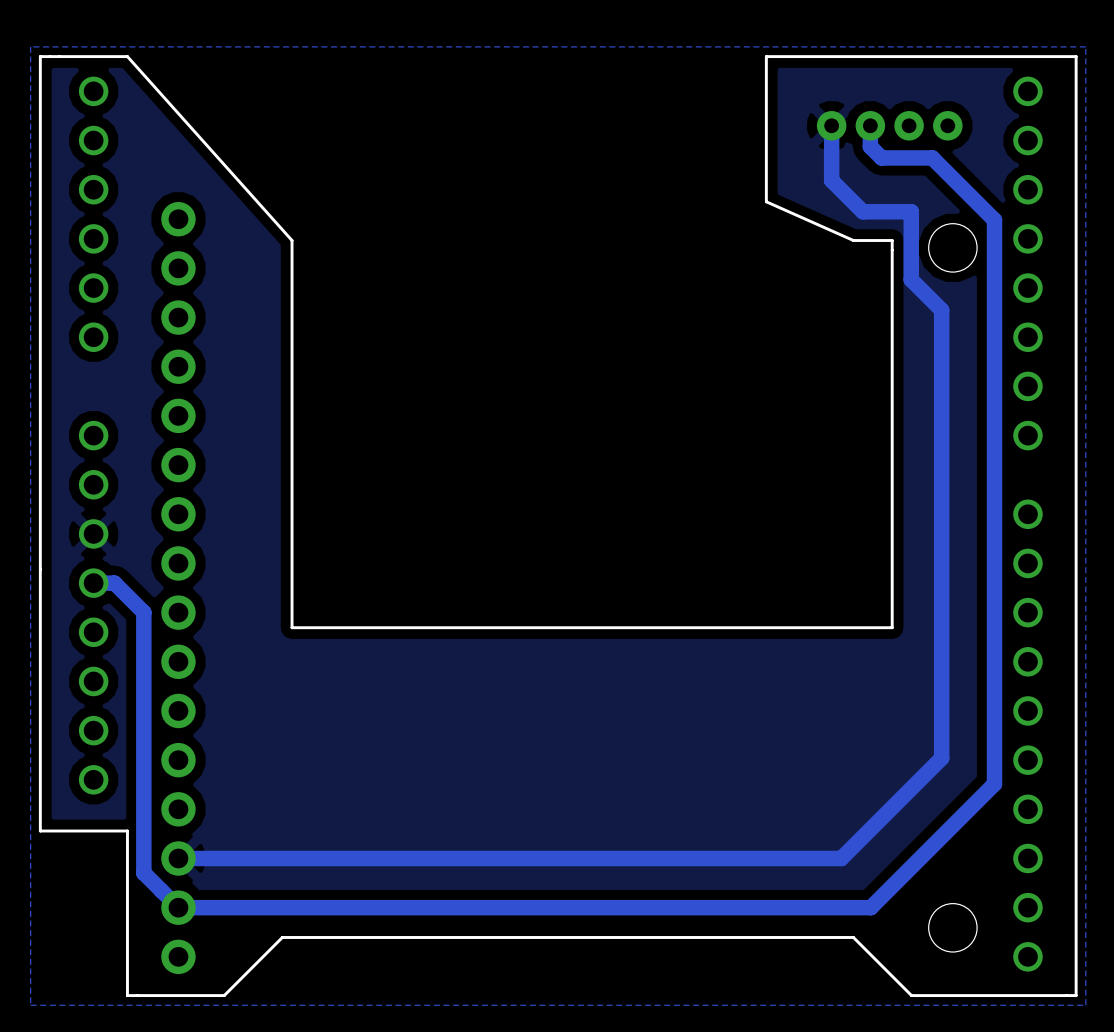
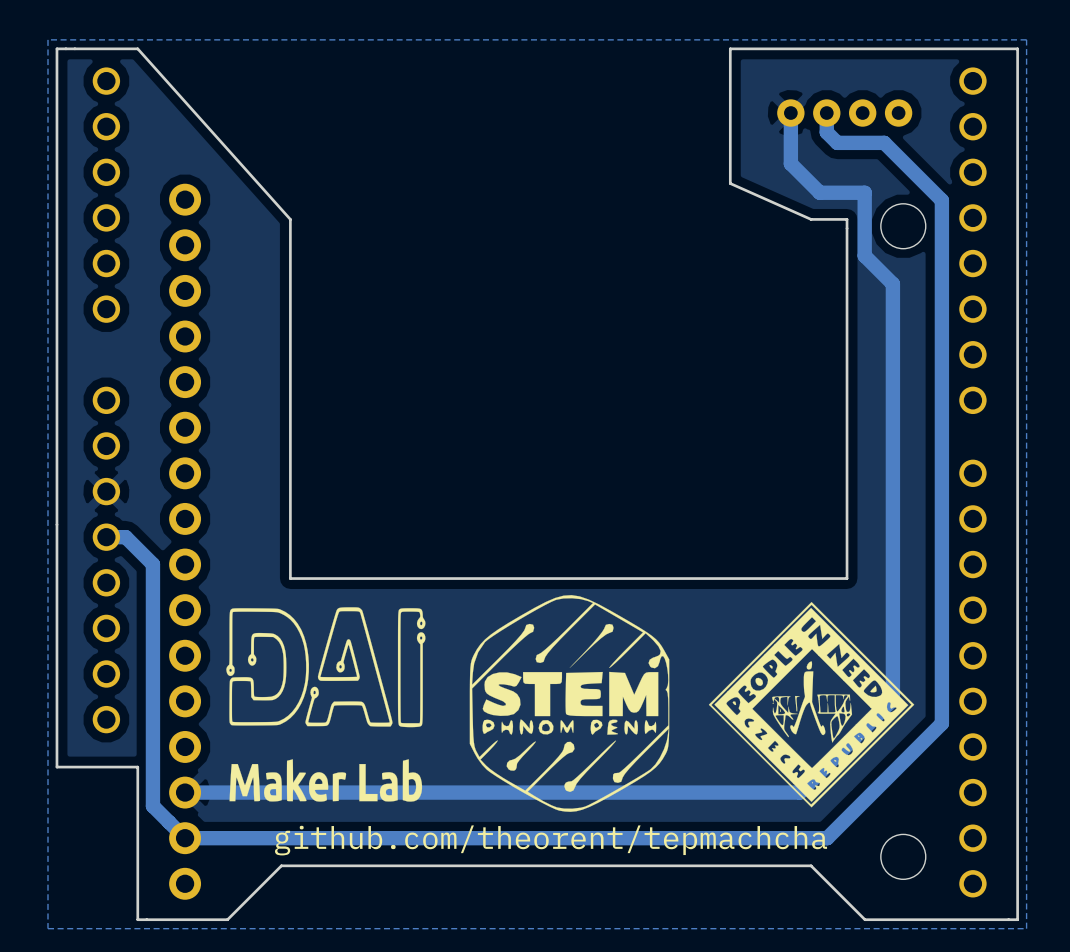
drawing: none -> [469, 595, 670, 812]
drawing: none -> [708, 601, 915, 808]
drawing: none -> [226, 607, 426, 802]
text: none -> github.com/theorent/tepmachcha (551, 840)

